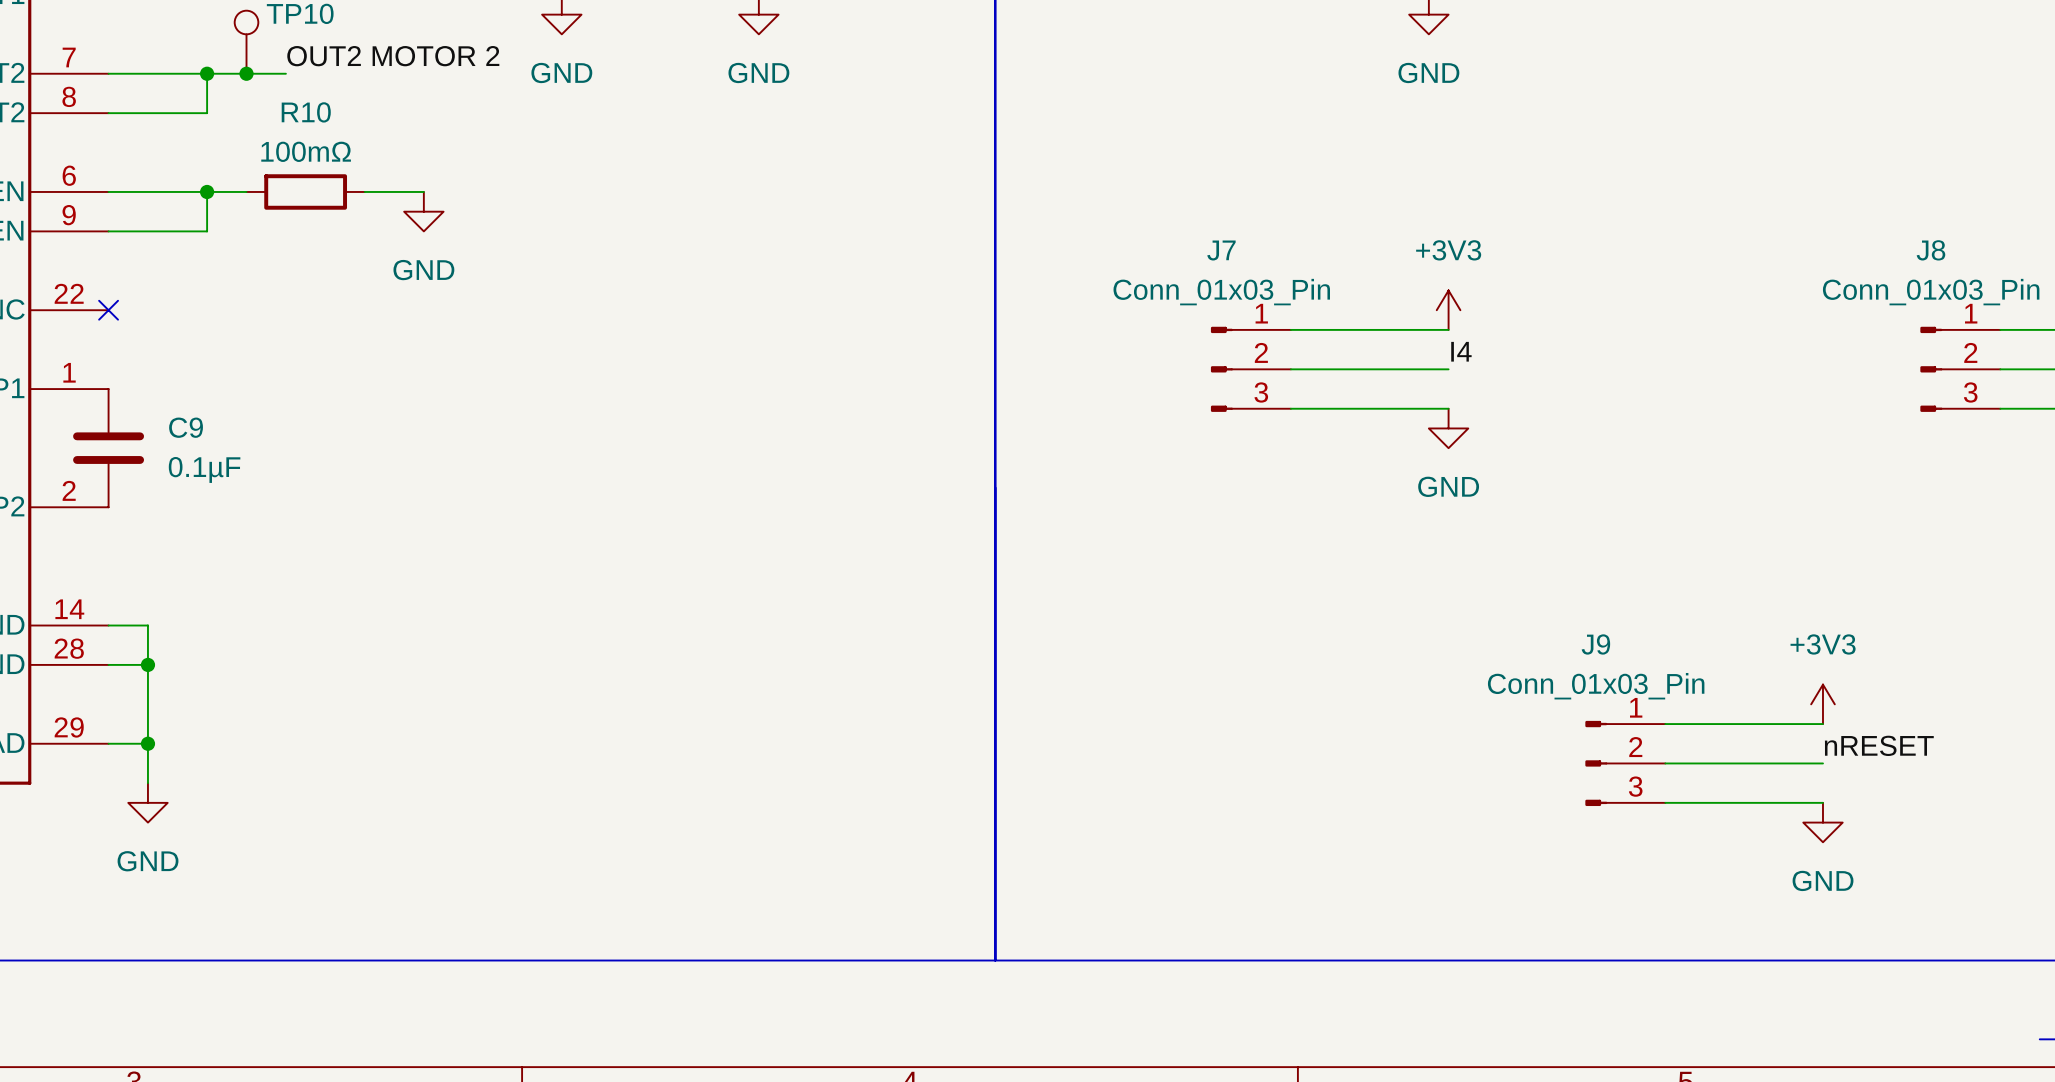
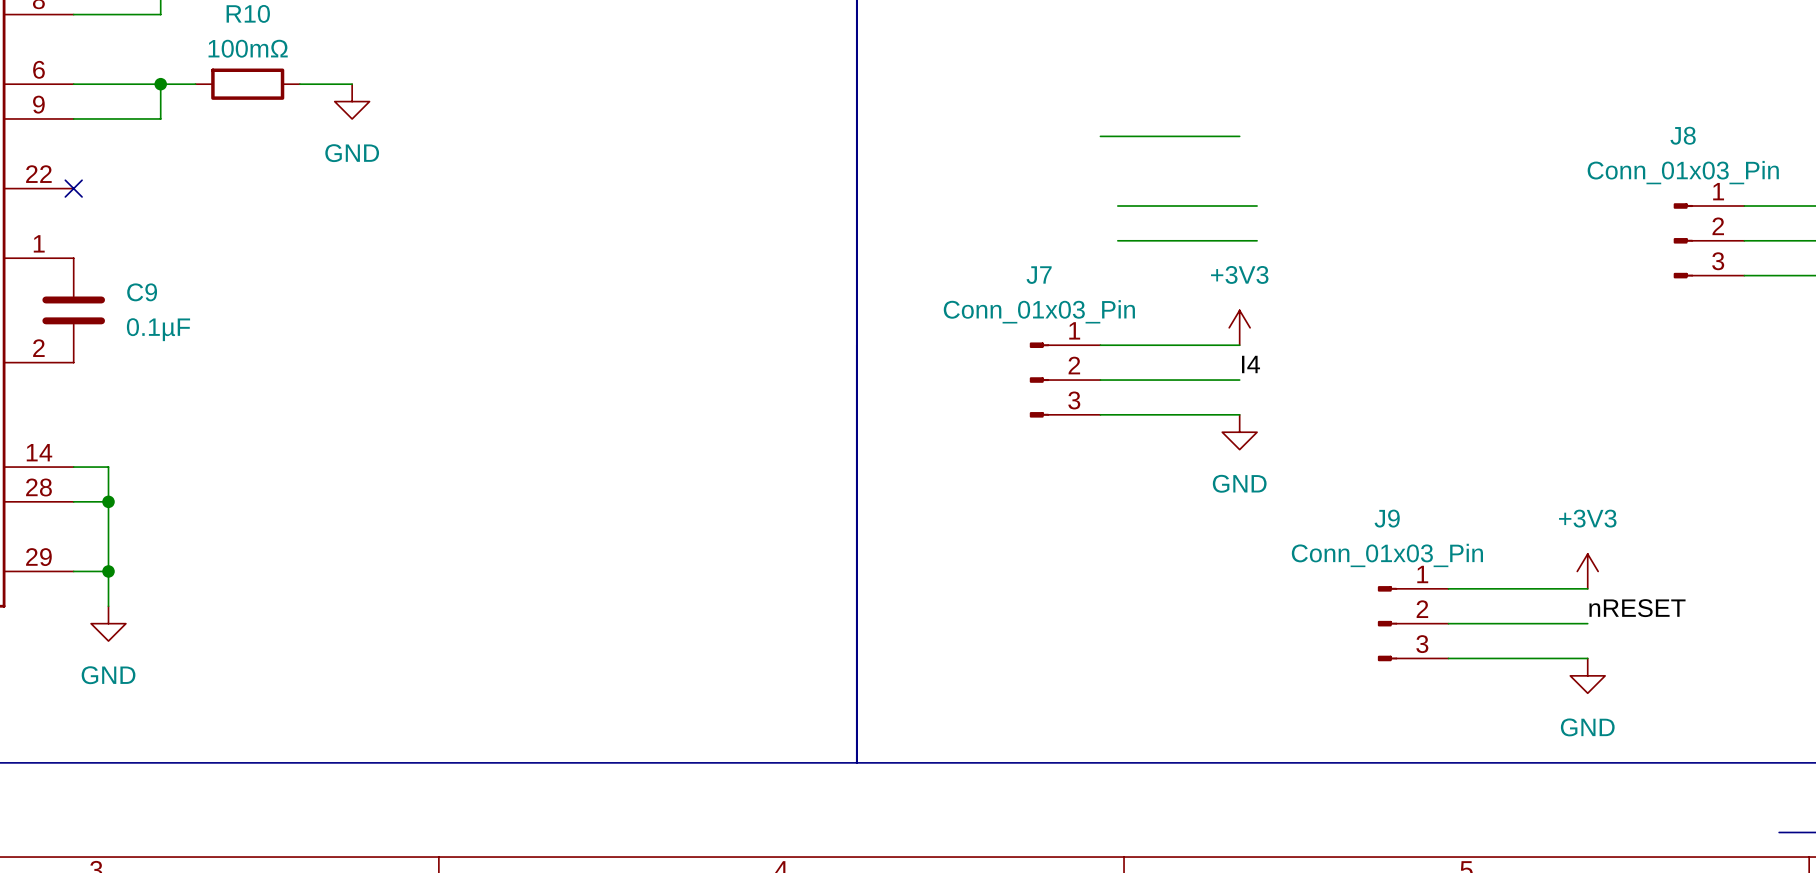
wire: none -> (1100, 136) (1239, 136)
power symbol position: +3V3 (1448, 310) -> +3V3 (1239, 327)
label position: I4 (1461, 351) -> I4 (1251, 364)
J7 position: (1250, 369) -> (1065, 380)
wire: (1290, 408) (1448, 408) -> (1100, 345) (1239, 345)
power symbol position: GND (1448, 428) -> GND (1239, 432)
wire: none -> (1100, 380) (1239, 380)
wire: none -> (1100, 414) (1239, 414)
power symbol position: +3V3 (1822, 704) -> +3V3 (1587, 571)
wire: (1665, 724) (1822, 724) -> (1448, 658) (1587, 658)
label position: nRESET (1879, 745) -> nRESET (1637, 608)
J9 position: (1625, 763) -> (1413, 623)
power symbol position: GND (1822, 822) -> GND (1587, 675)

